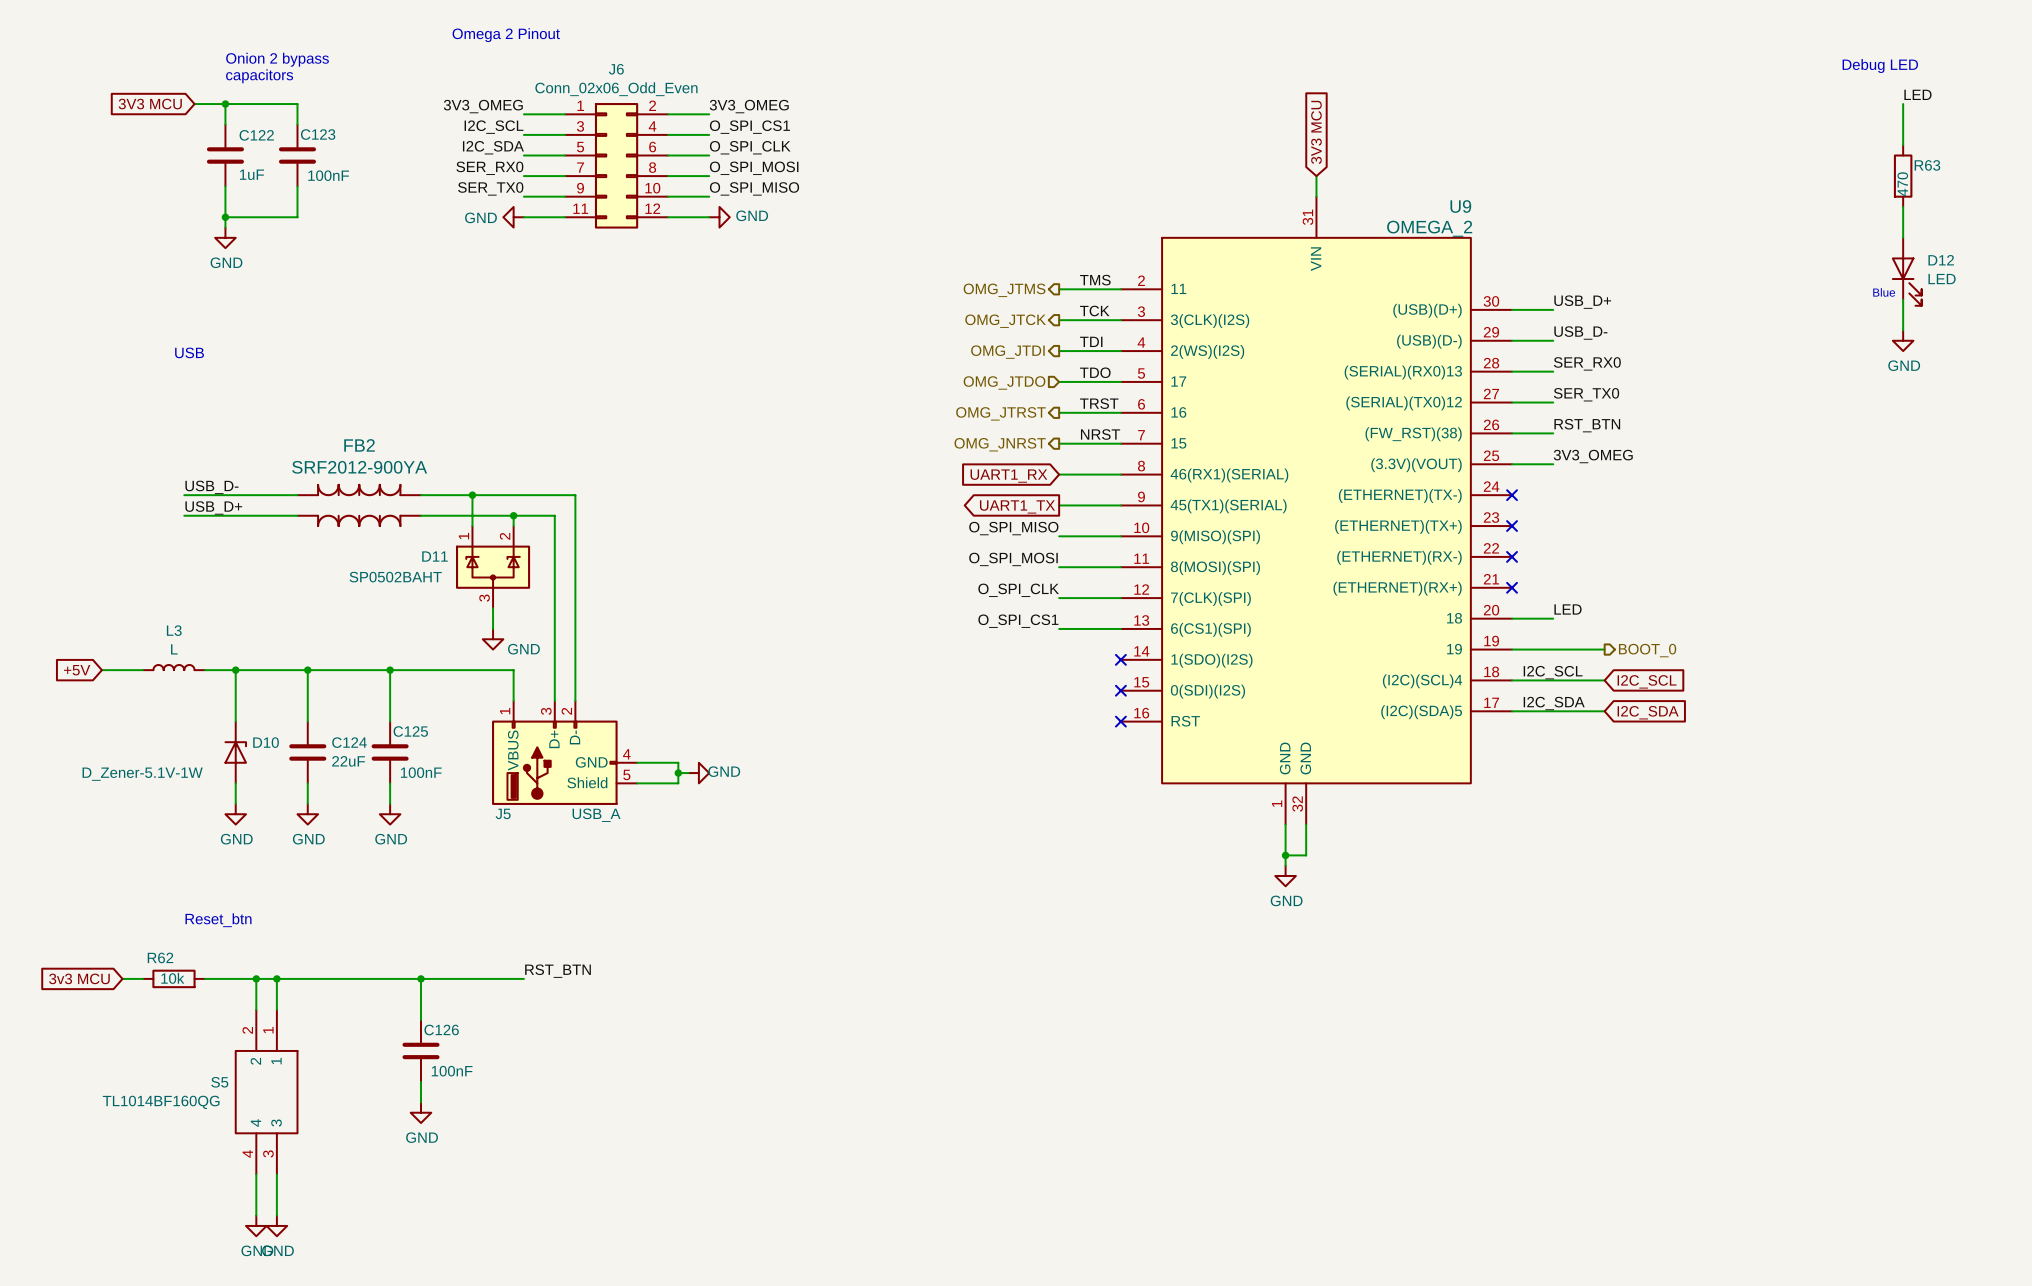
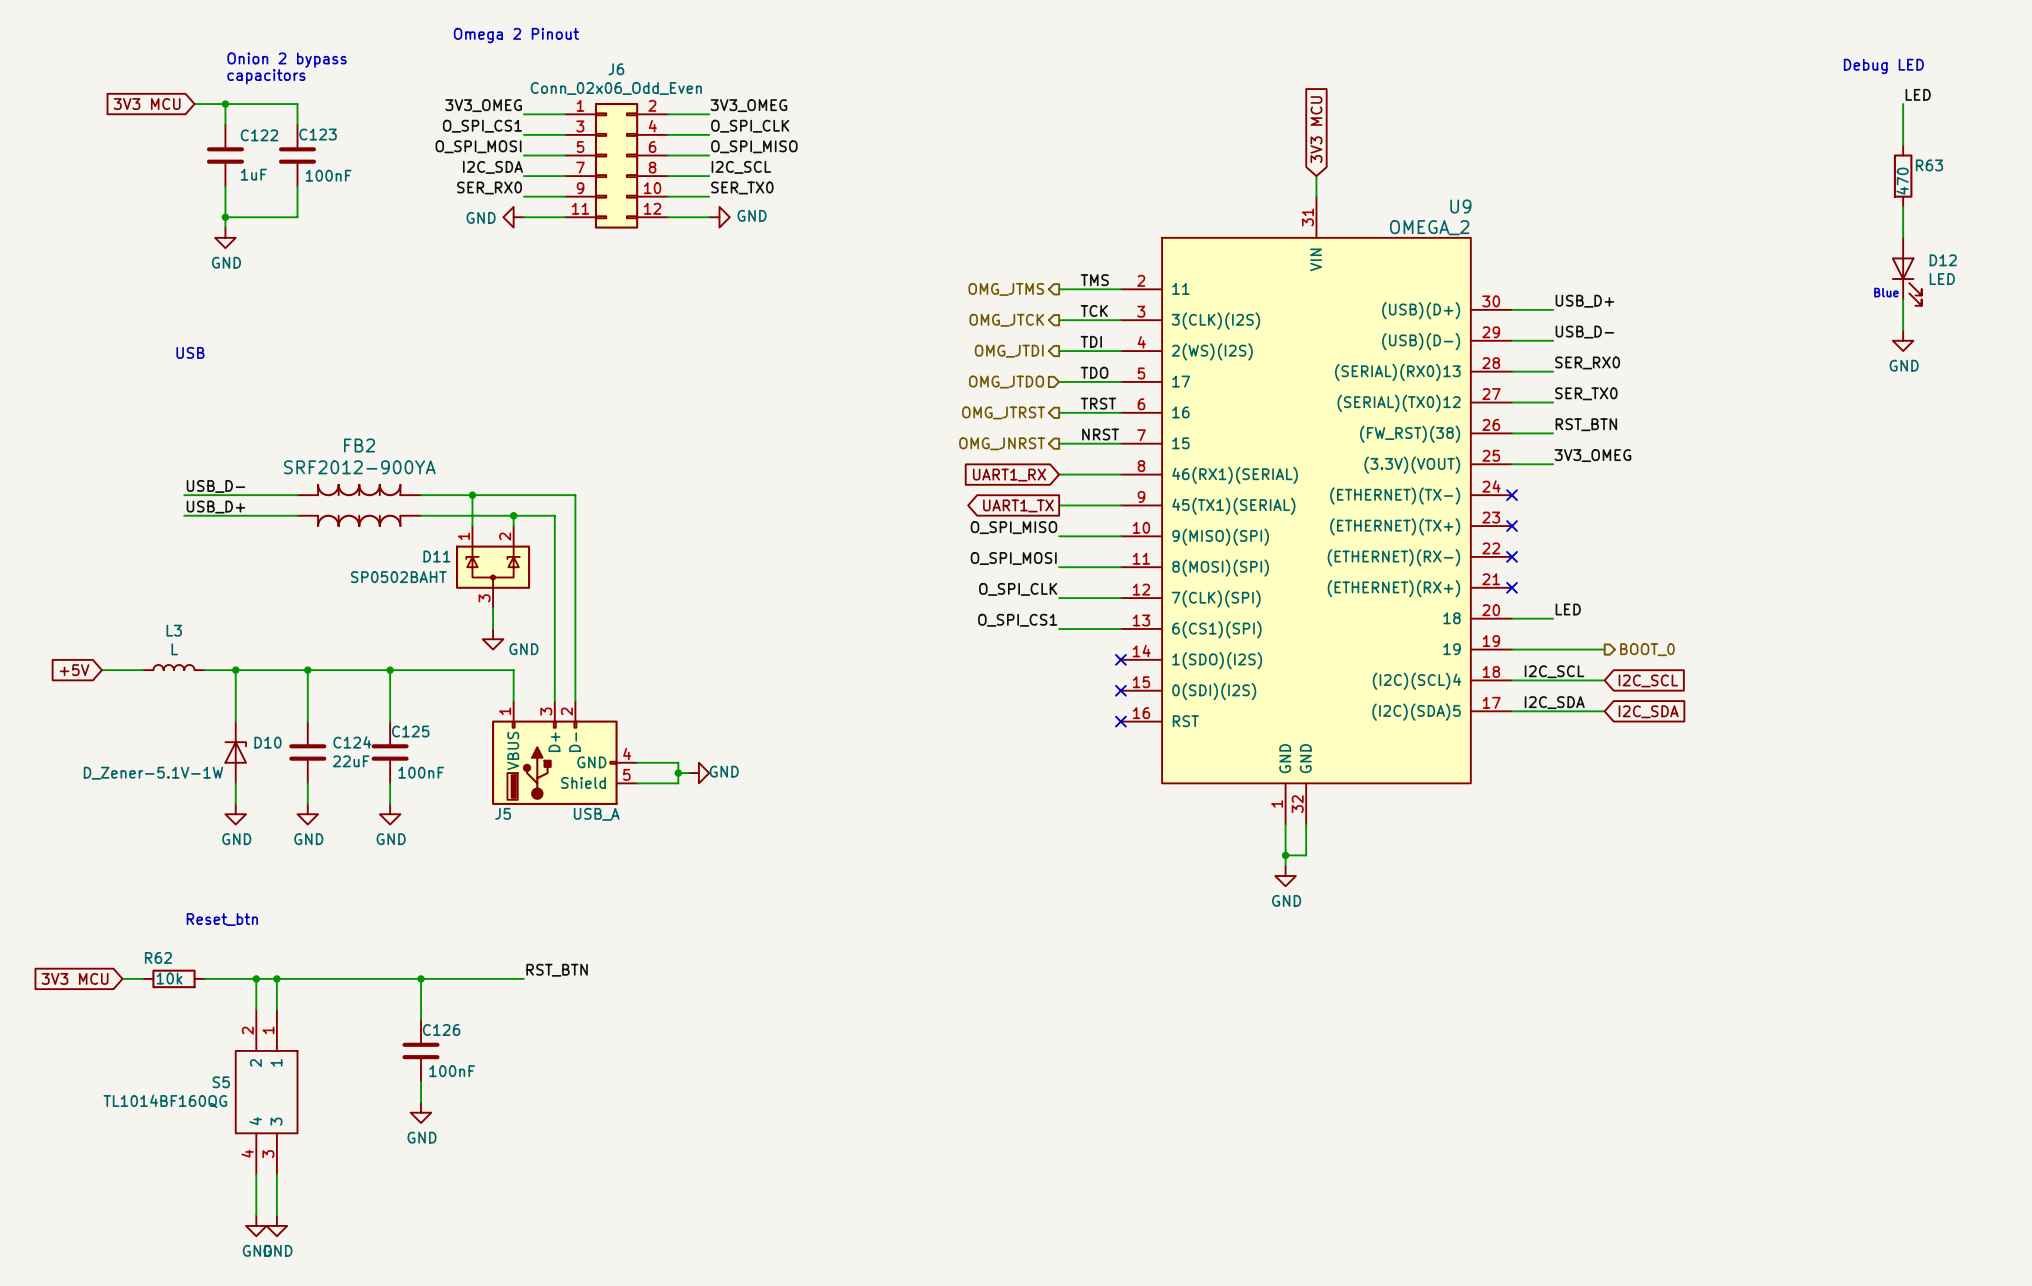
label: I2C_SCL (494, 127) -> O_SPI_CS1 (482, 126)
label: O_SPI_CS1 (749, 127) -> O_SPI_CLK (750, 126)
label: I2C_SDA (493, 147) -> O_SPI_MOSI (478, 146)
label: O_SPI_CLK (750, 147) -> O_SPI_MISO (754, 146)
label: SER_RX0 (489, 168) -> I2C_SDA (492, 167)
label: O_SPI_MOSI (754, 168) -> I2C_SCL (741, 167)
label: SER_TX0 (490, 188) -> SER_RX0 (489, 187)
label: O_SPI_MISO (754, 188) -> SER_TX0 (742, 187)
global label: 3v3 MCU (79, 978) -> 3V3 MCU (75, 978)

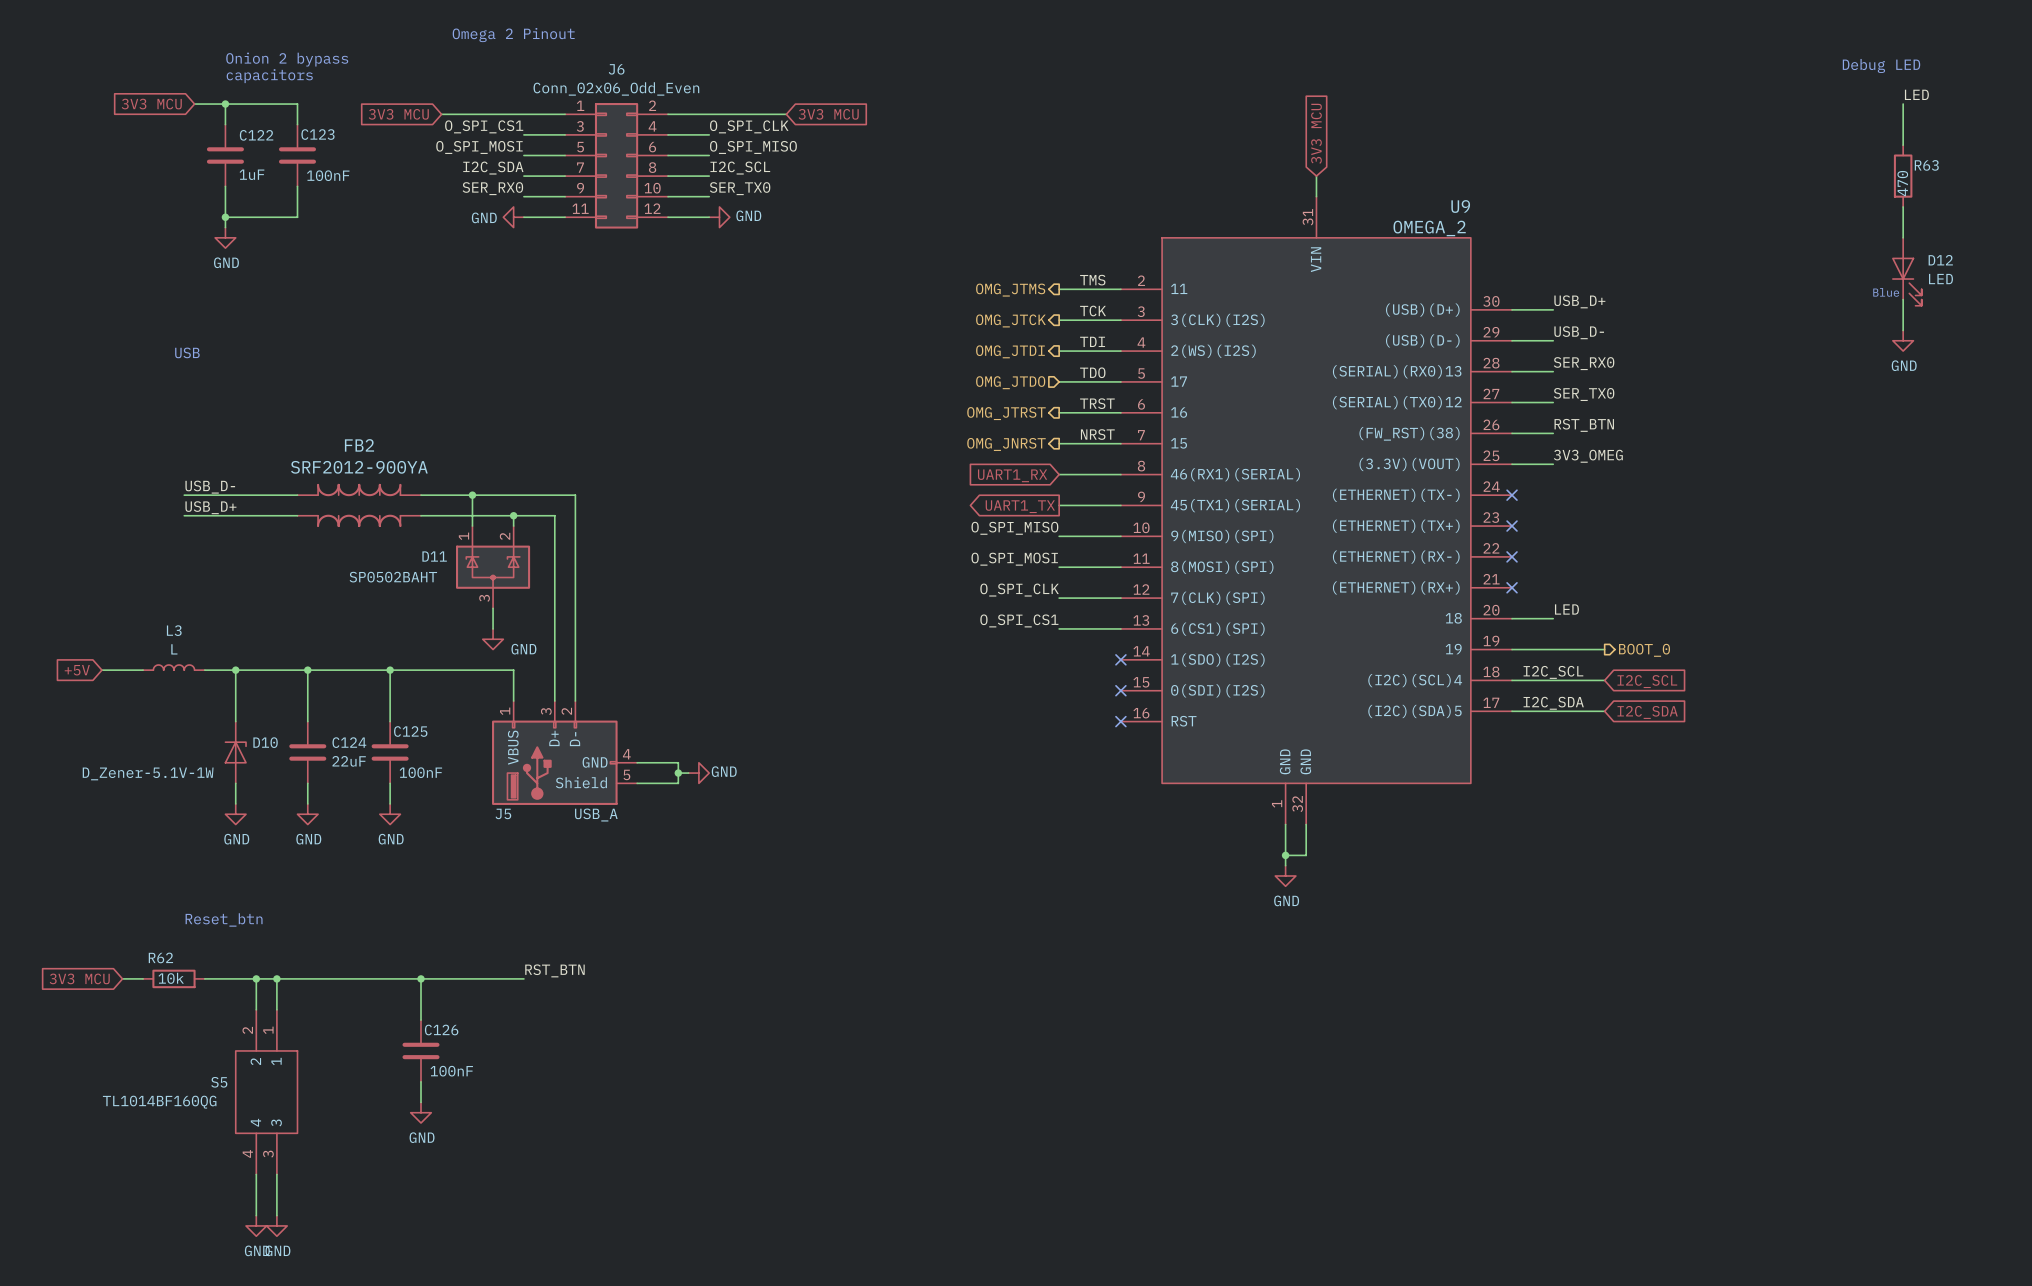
label: 3V3_OMEG (483, 105) -> none
label: 3V3_OMEG (748, 105) -> none
global label: none -> 3V3 MCU (398, 114)
wire: none -> (441, 114) (523, 114)
wire: none -> (709, 114) (786, 114)
global label: none -> 3V3 MCU (828, 114)

